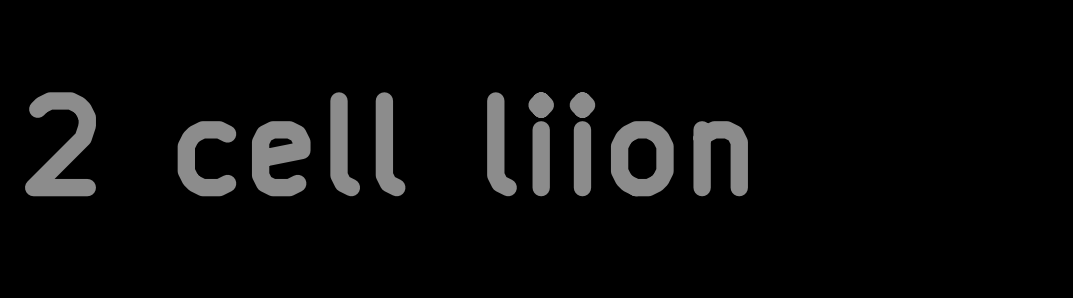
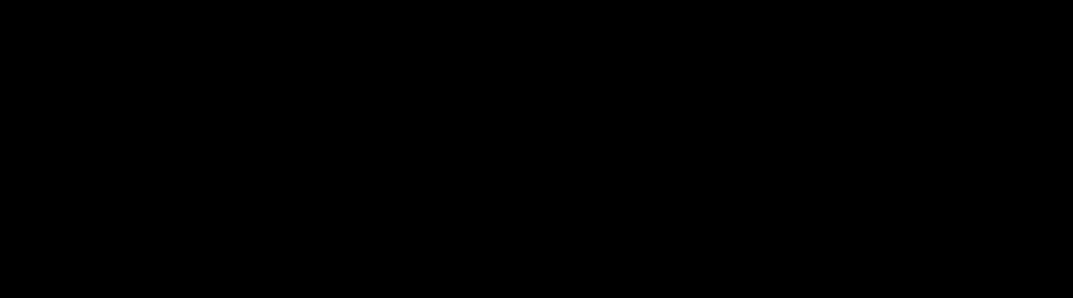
text: 2 cell liion (386, 144) -> none

